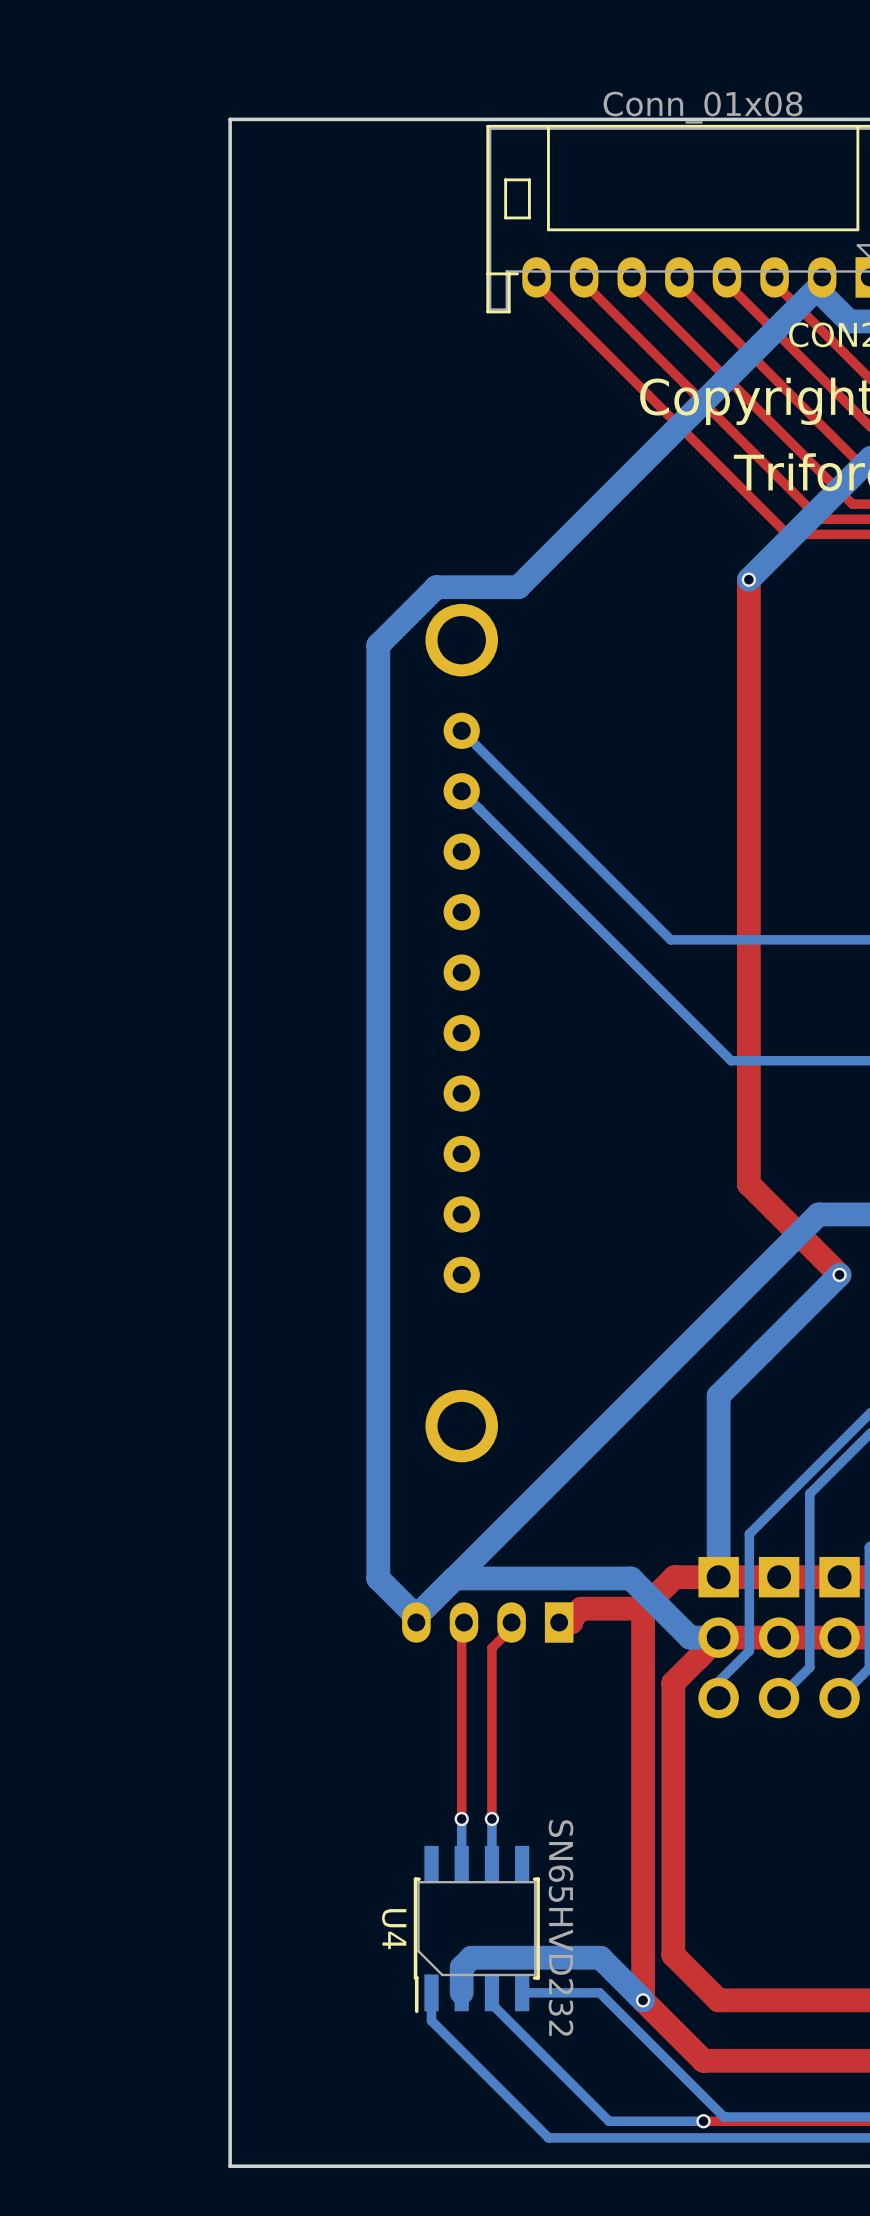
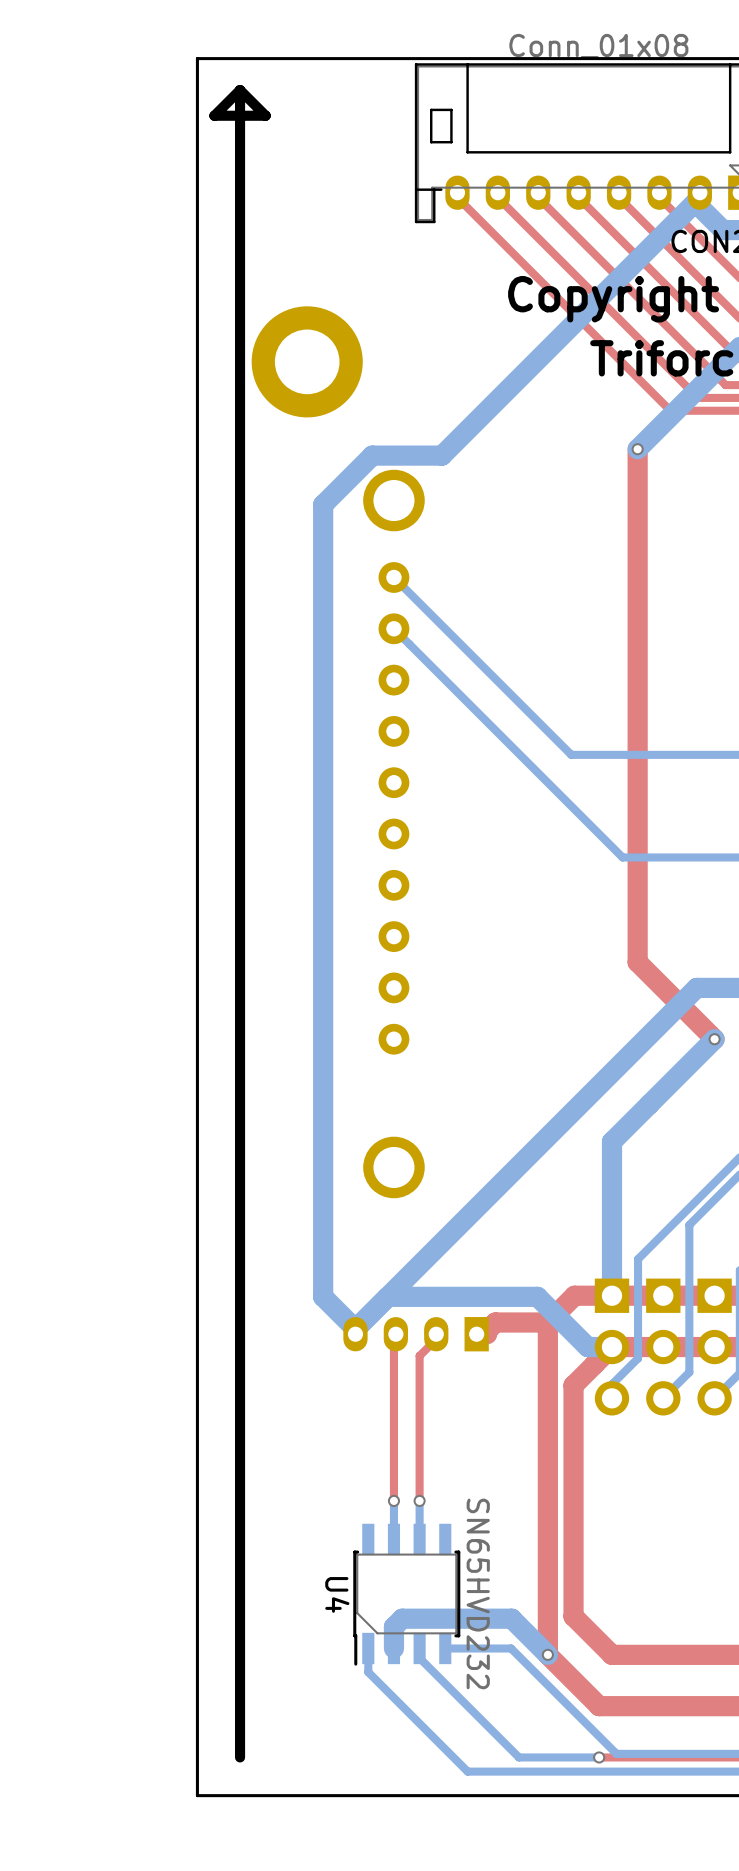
line: none -> (240, 90) (265, 115) (214, 115) (240, 90)
line: none -> (240, 90) (240, 1757)
part: none -> (307, 361)

